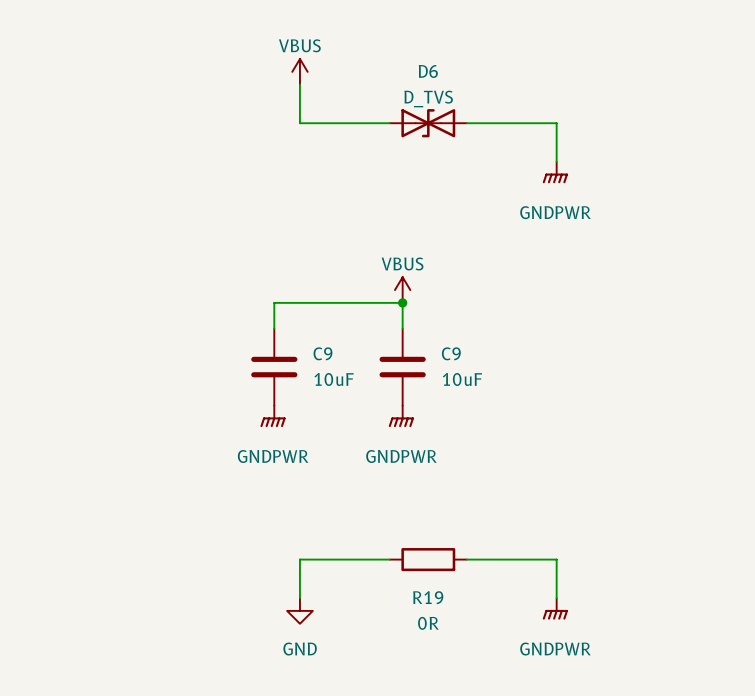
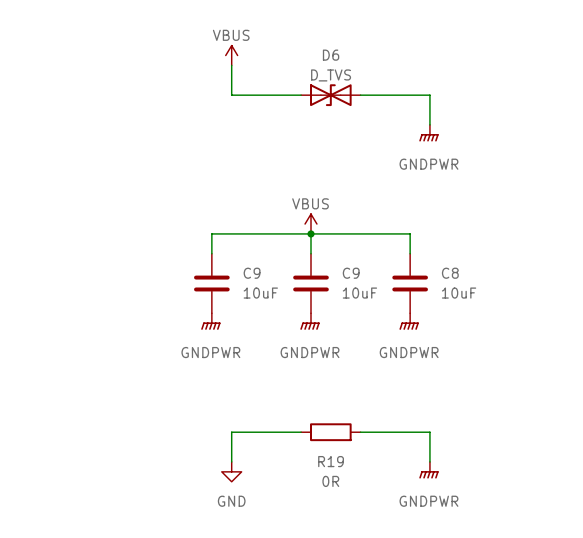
wire: none -> (311, 233) (410, 233) (410, 253)
C8: none -> 10uF (410, 283)
power symbol: none -> GNDPWR (409, 321)

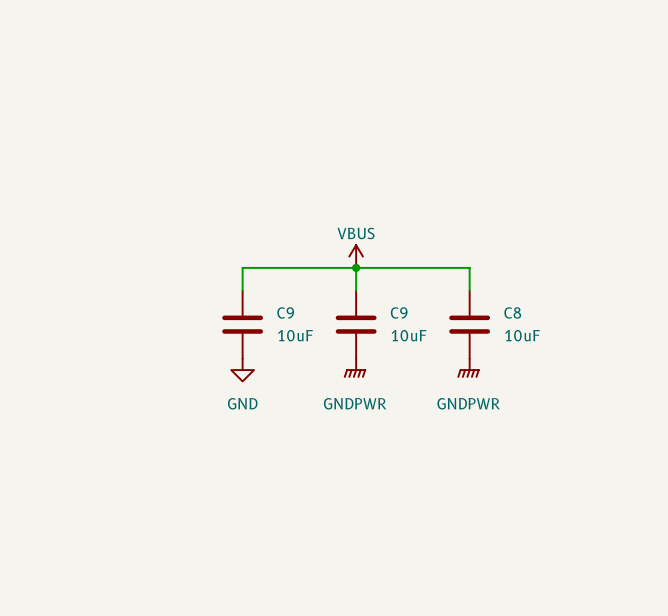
power symbol: VBUS (231, 55) -> none
wire: (231, 65) (231, 95) (301, 95) -> none
D6: D_TVS (330, 95) -> none
wire: (360, 95) (429, 95) (429, 124) -> none
power symbol: GNDPWR (428, 133) -> none
power symbol: GNDPWR (210, 321) -> GND (242, 370)
wire: (301, 432) (231, 432) (231, 461) -> none
R19: 0R (330, 432) -> none
wire: (360, 432) (429, 432) (429, 461) -> none
power symbol: GNDPWR (428, 470) -> none
power symbol: GND (231, 471) -> none

